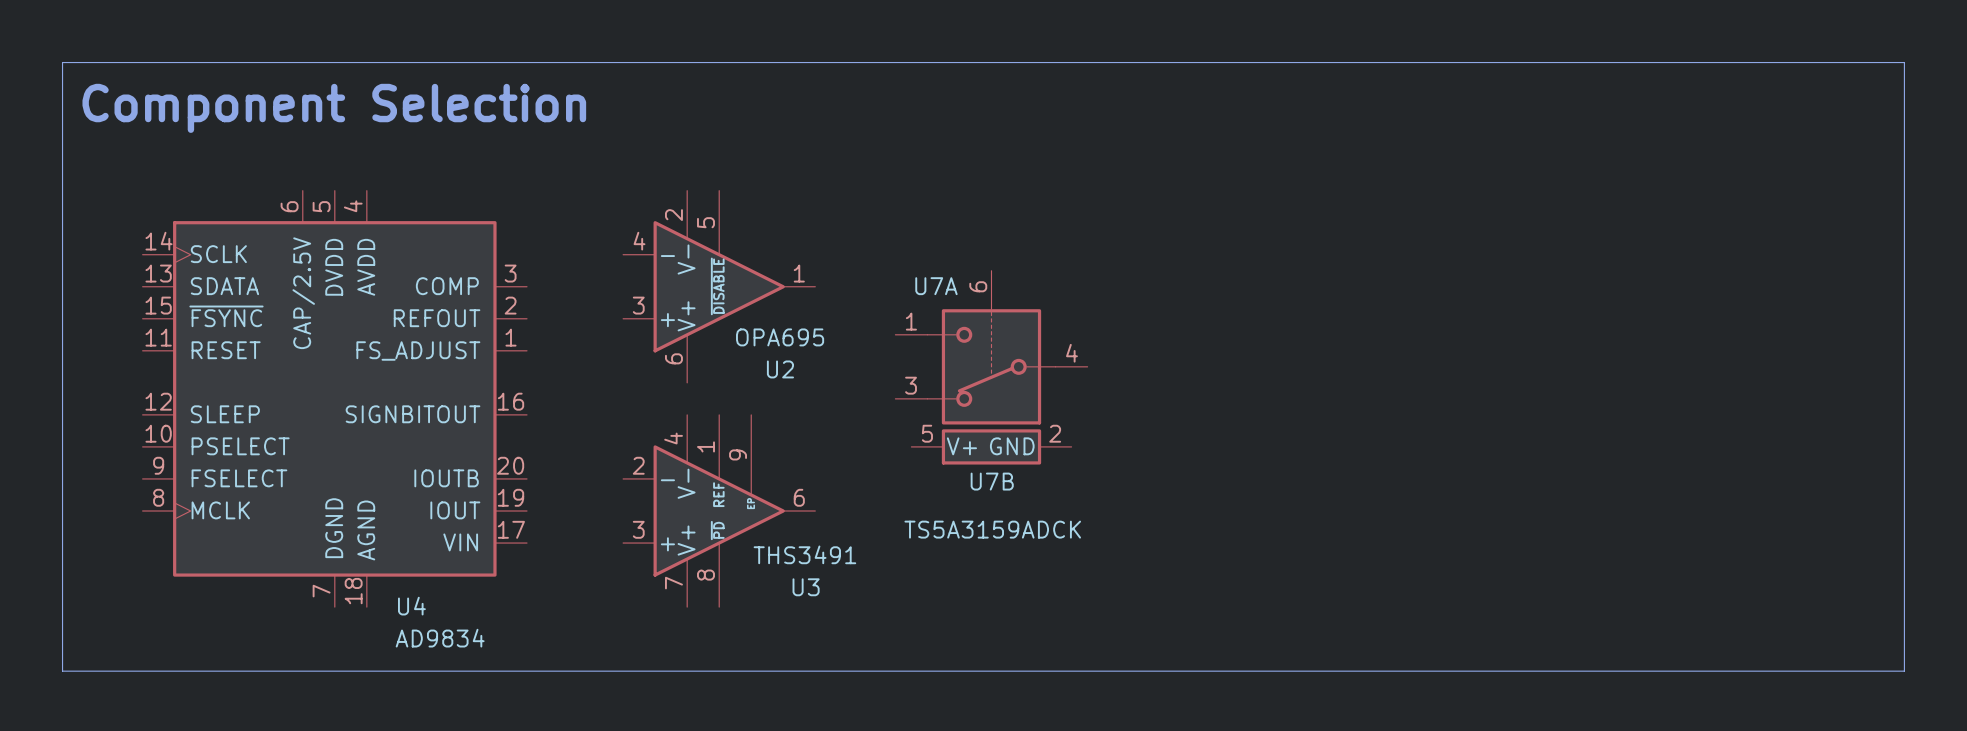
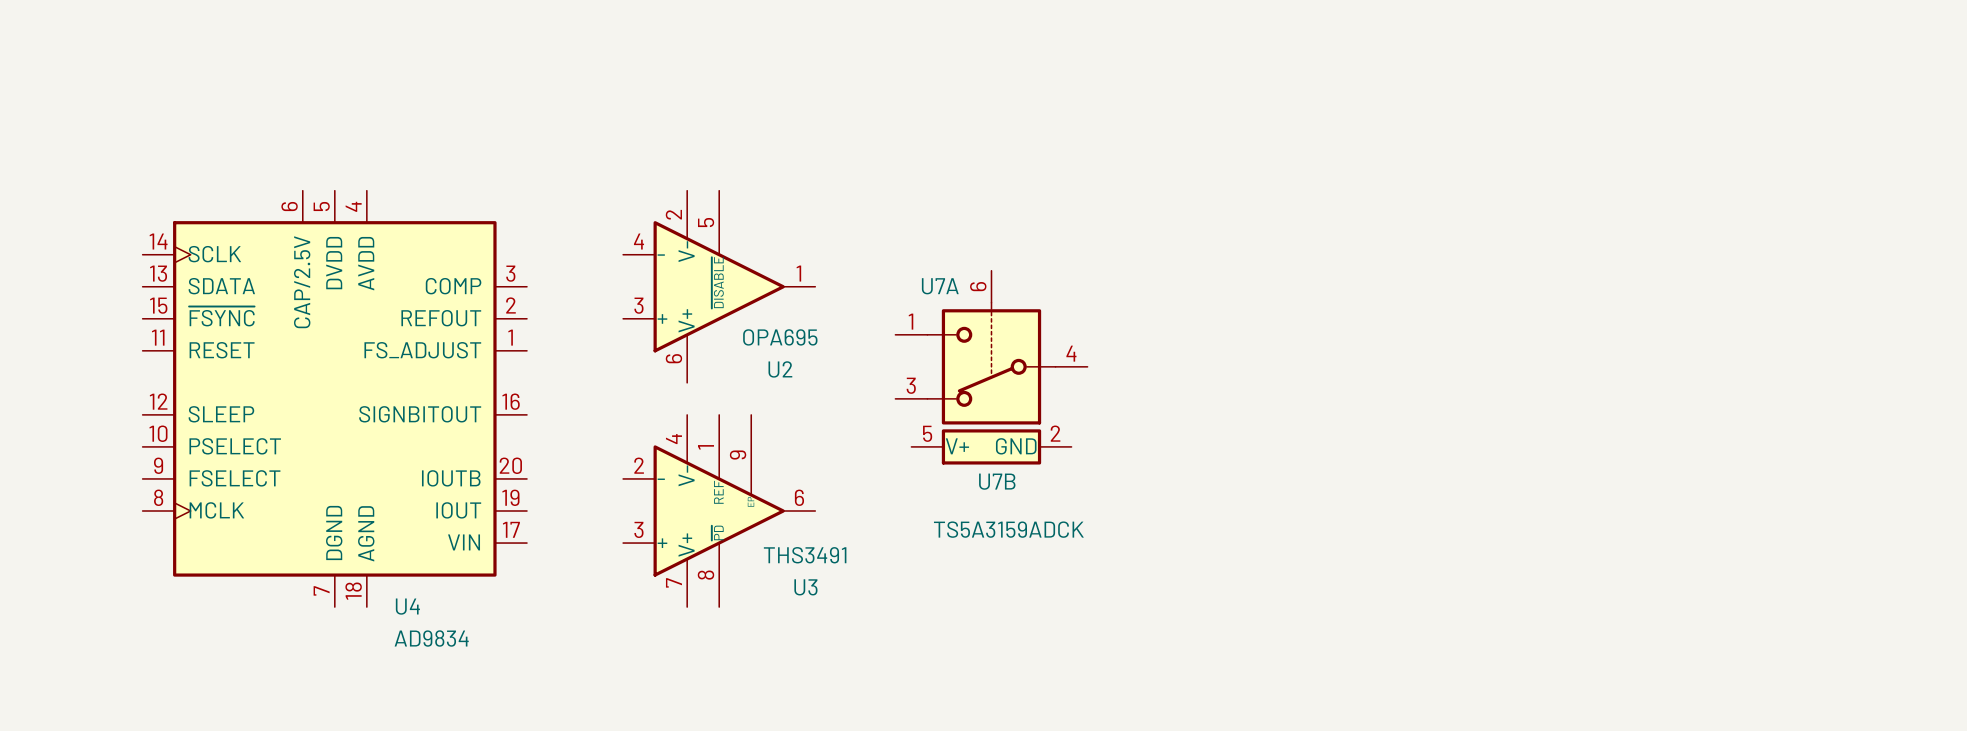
line: (62, 62) (1904, 62) (1904, 671) (62, 671) (62, 62) -> none
text: Component Selection (334, 108) -> none

